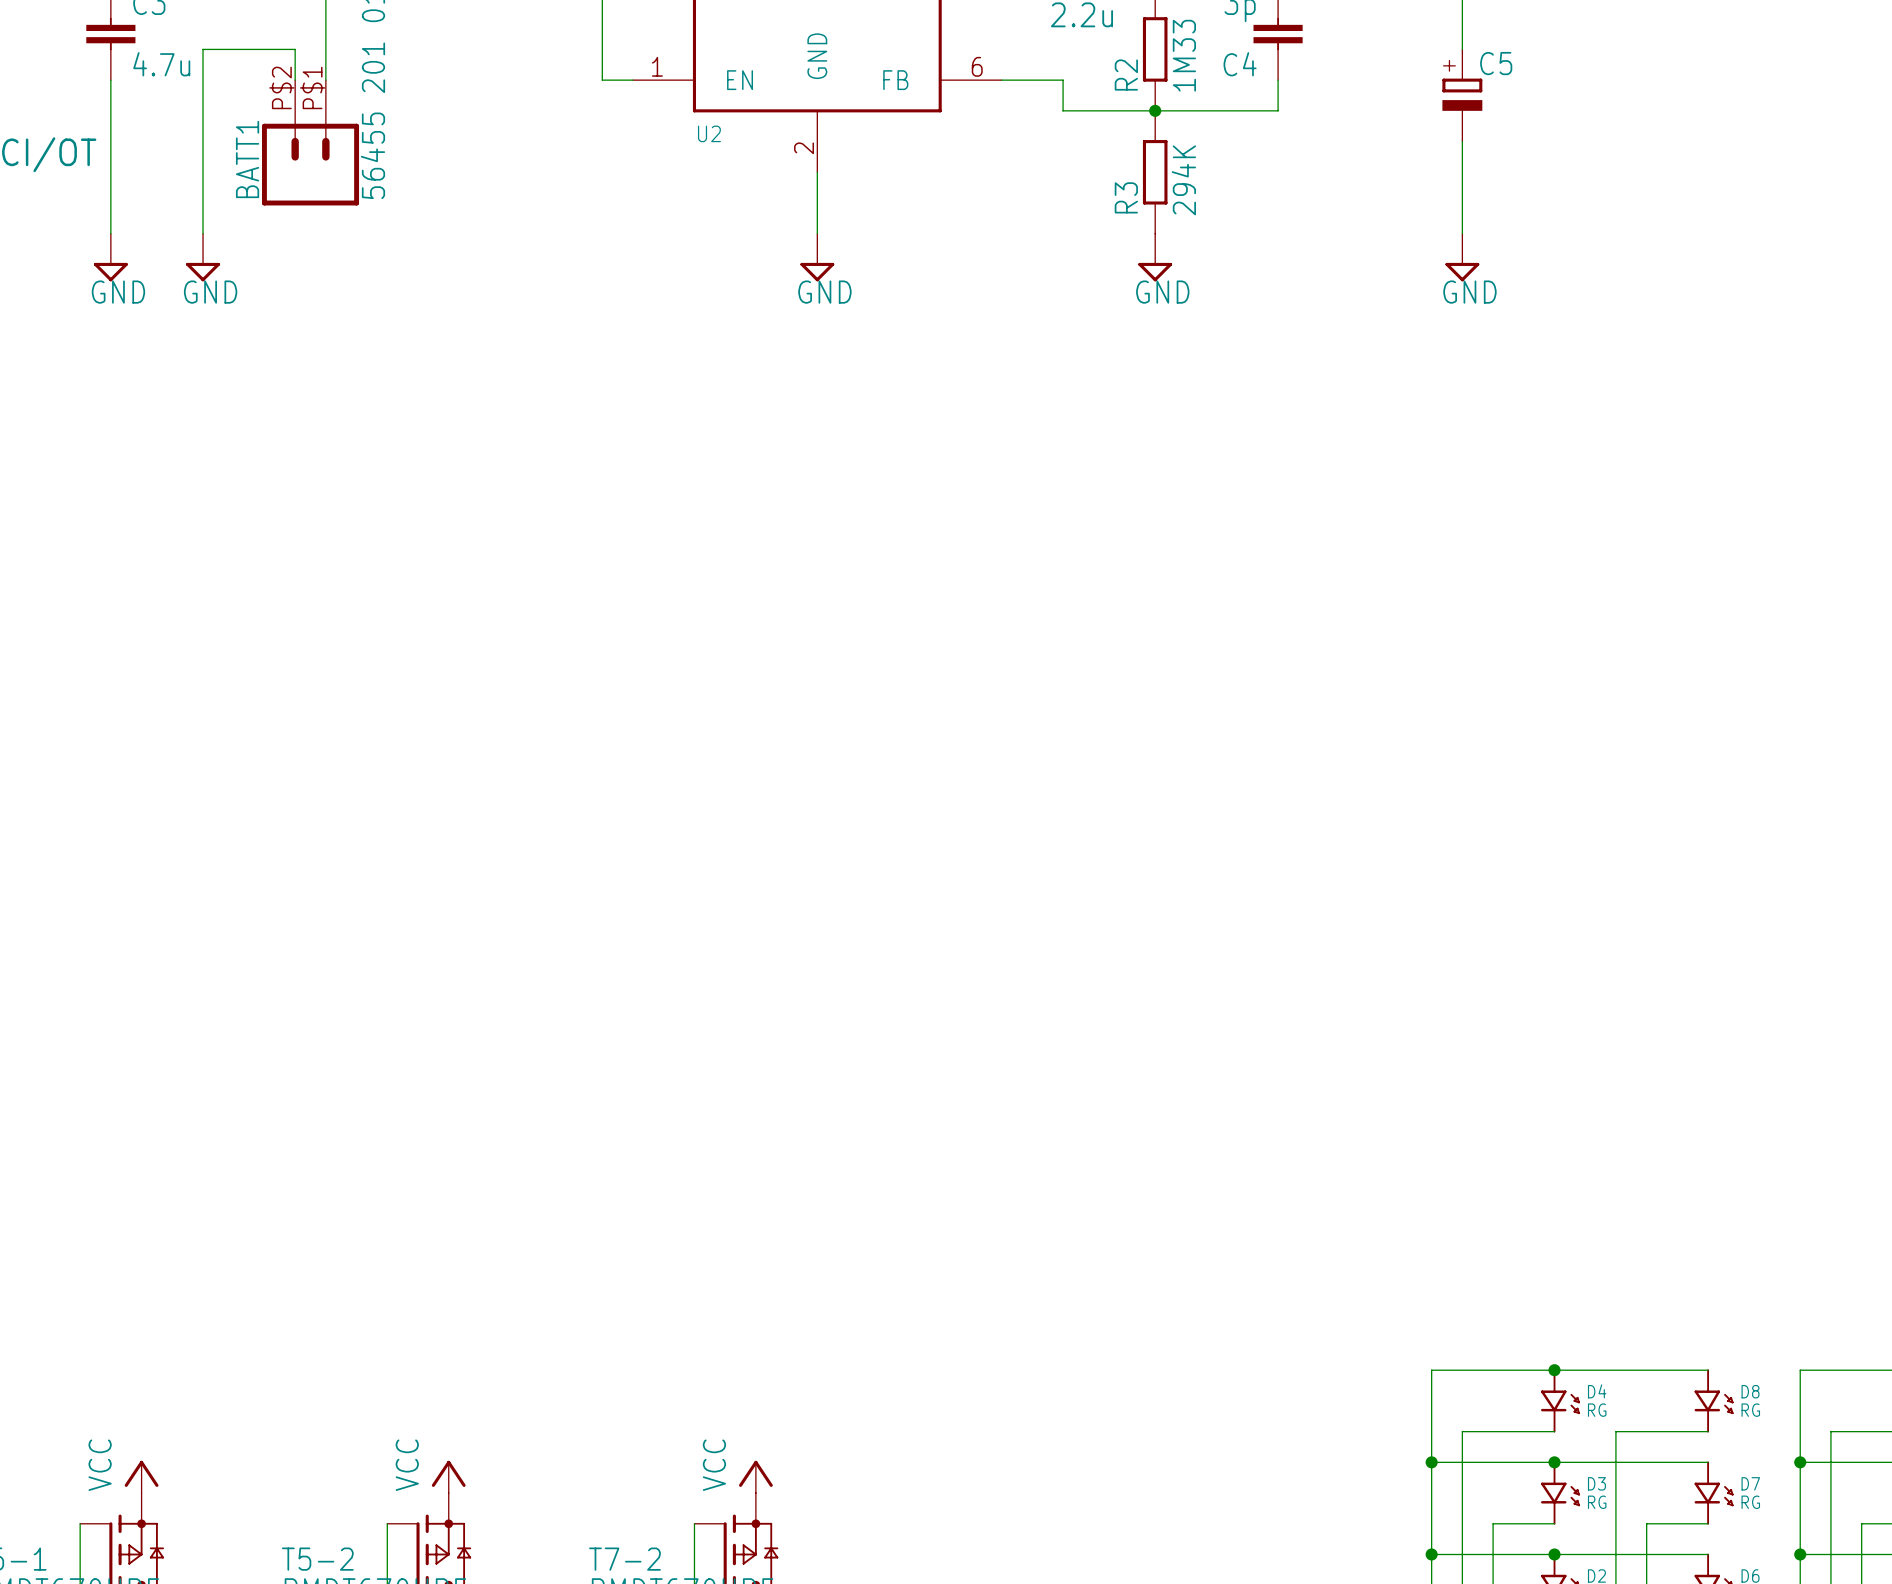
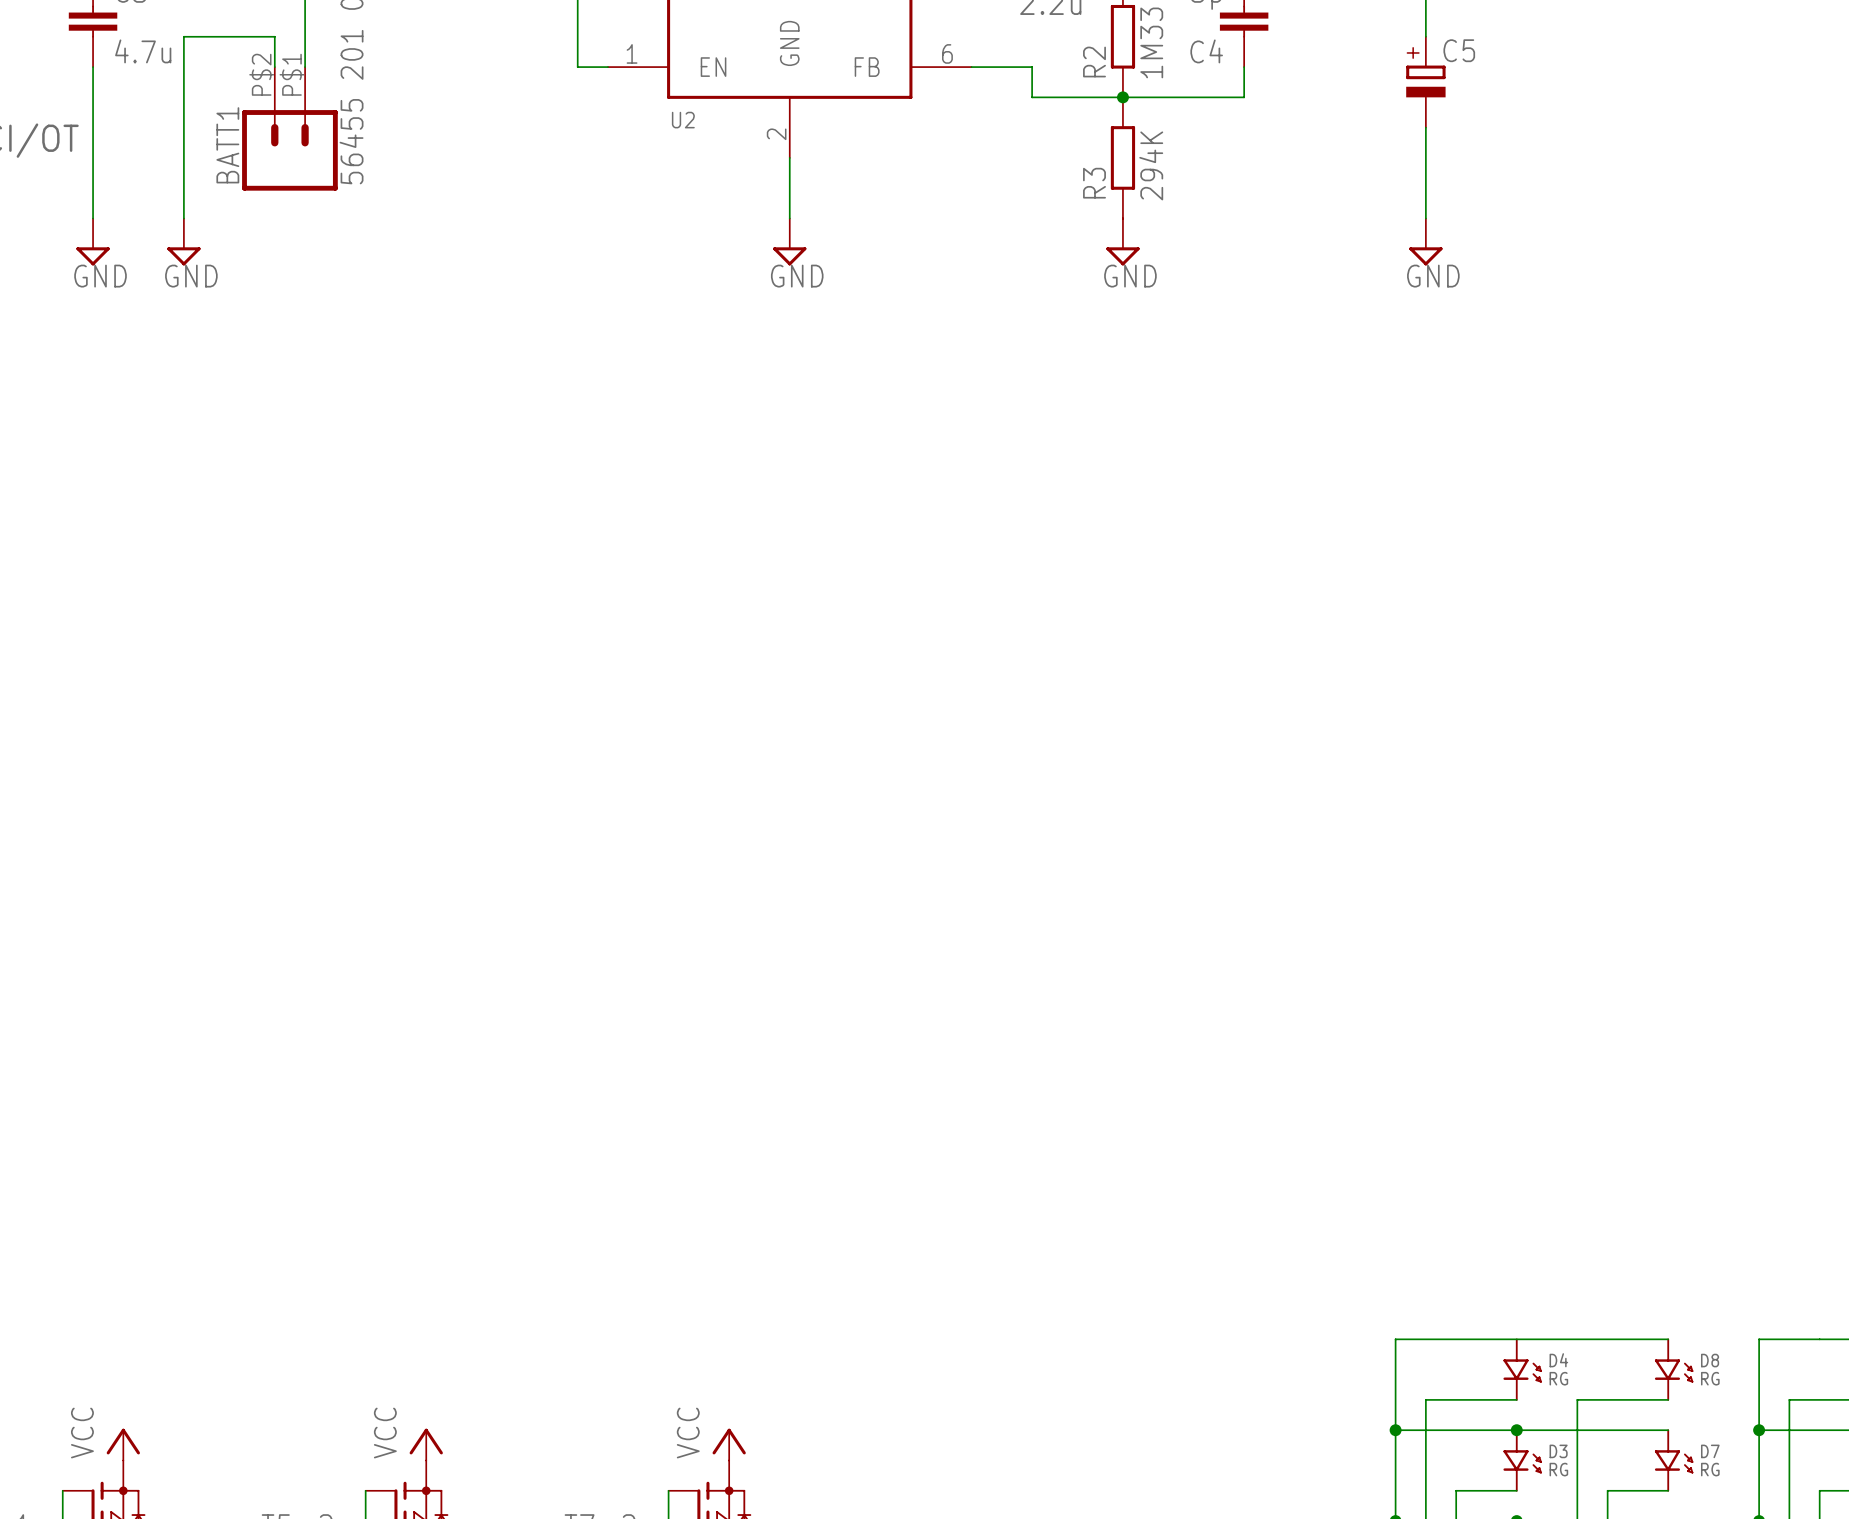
junction: (1554, 1370) -> none

